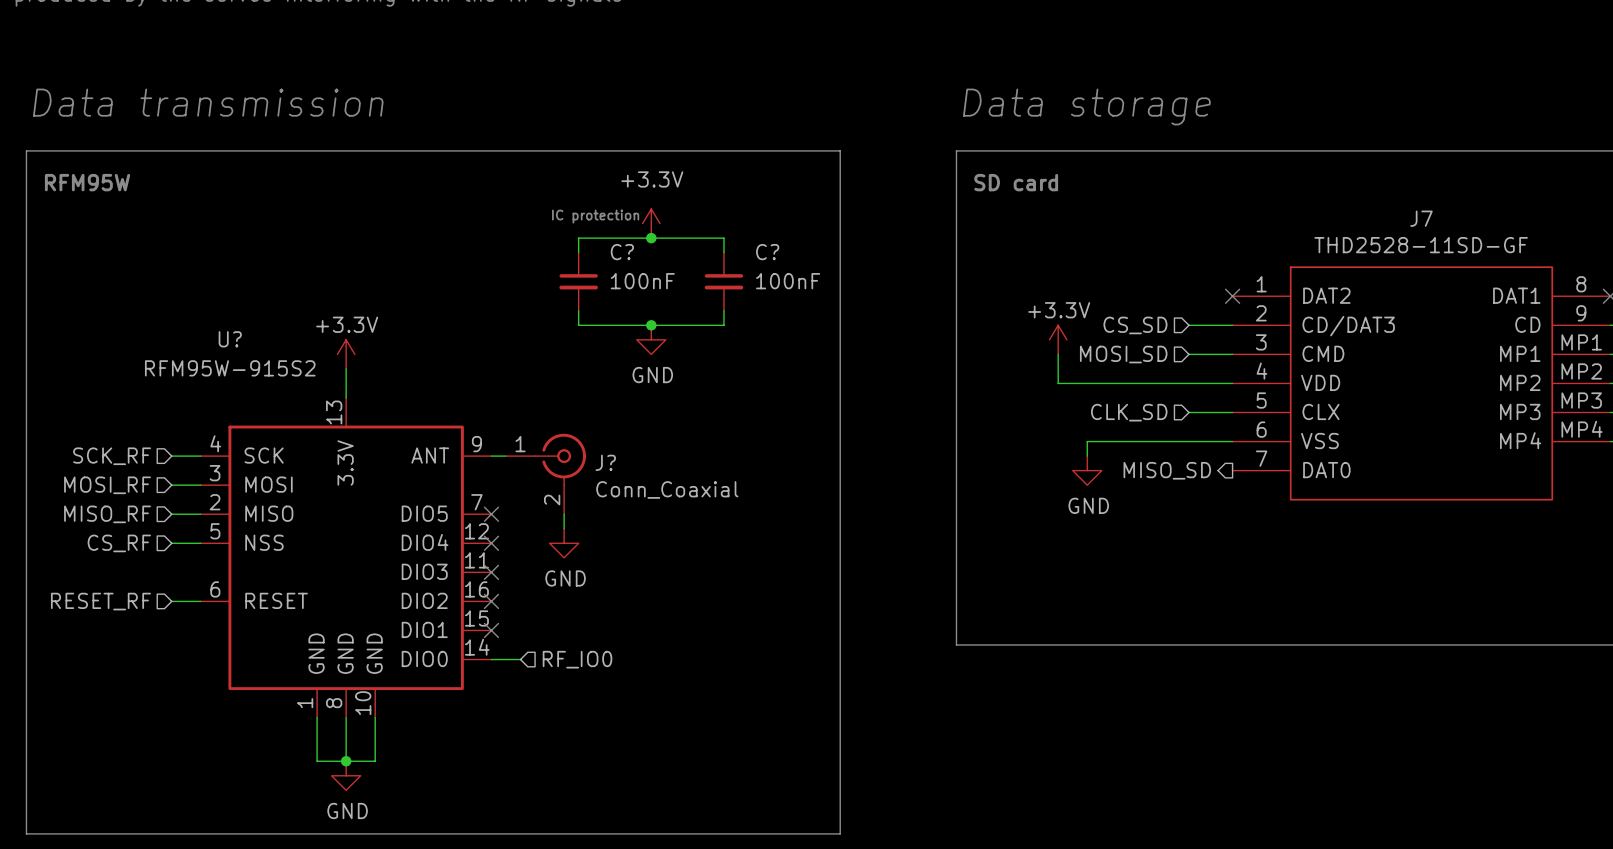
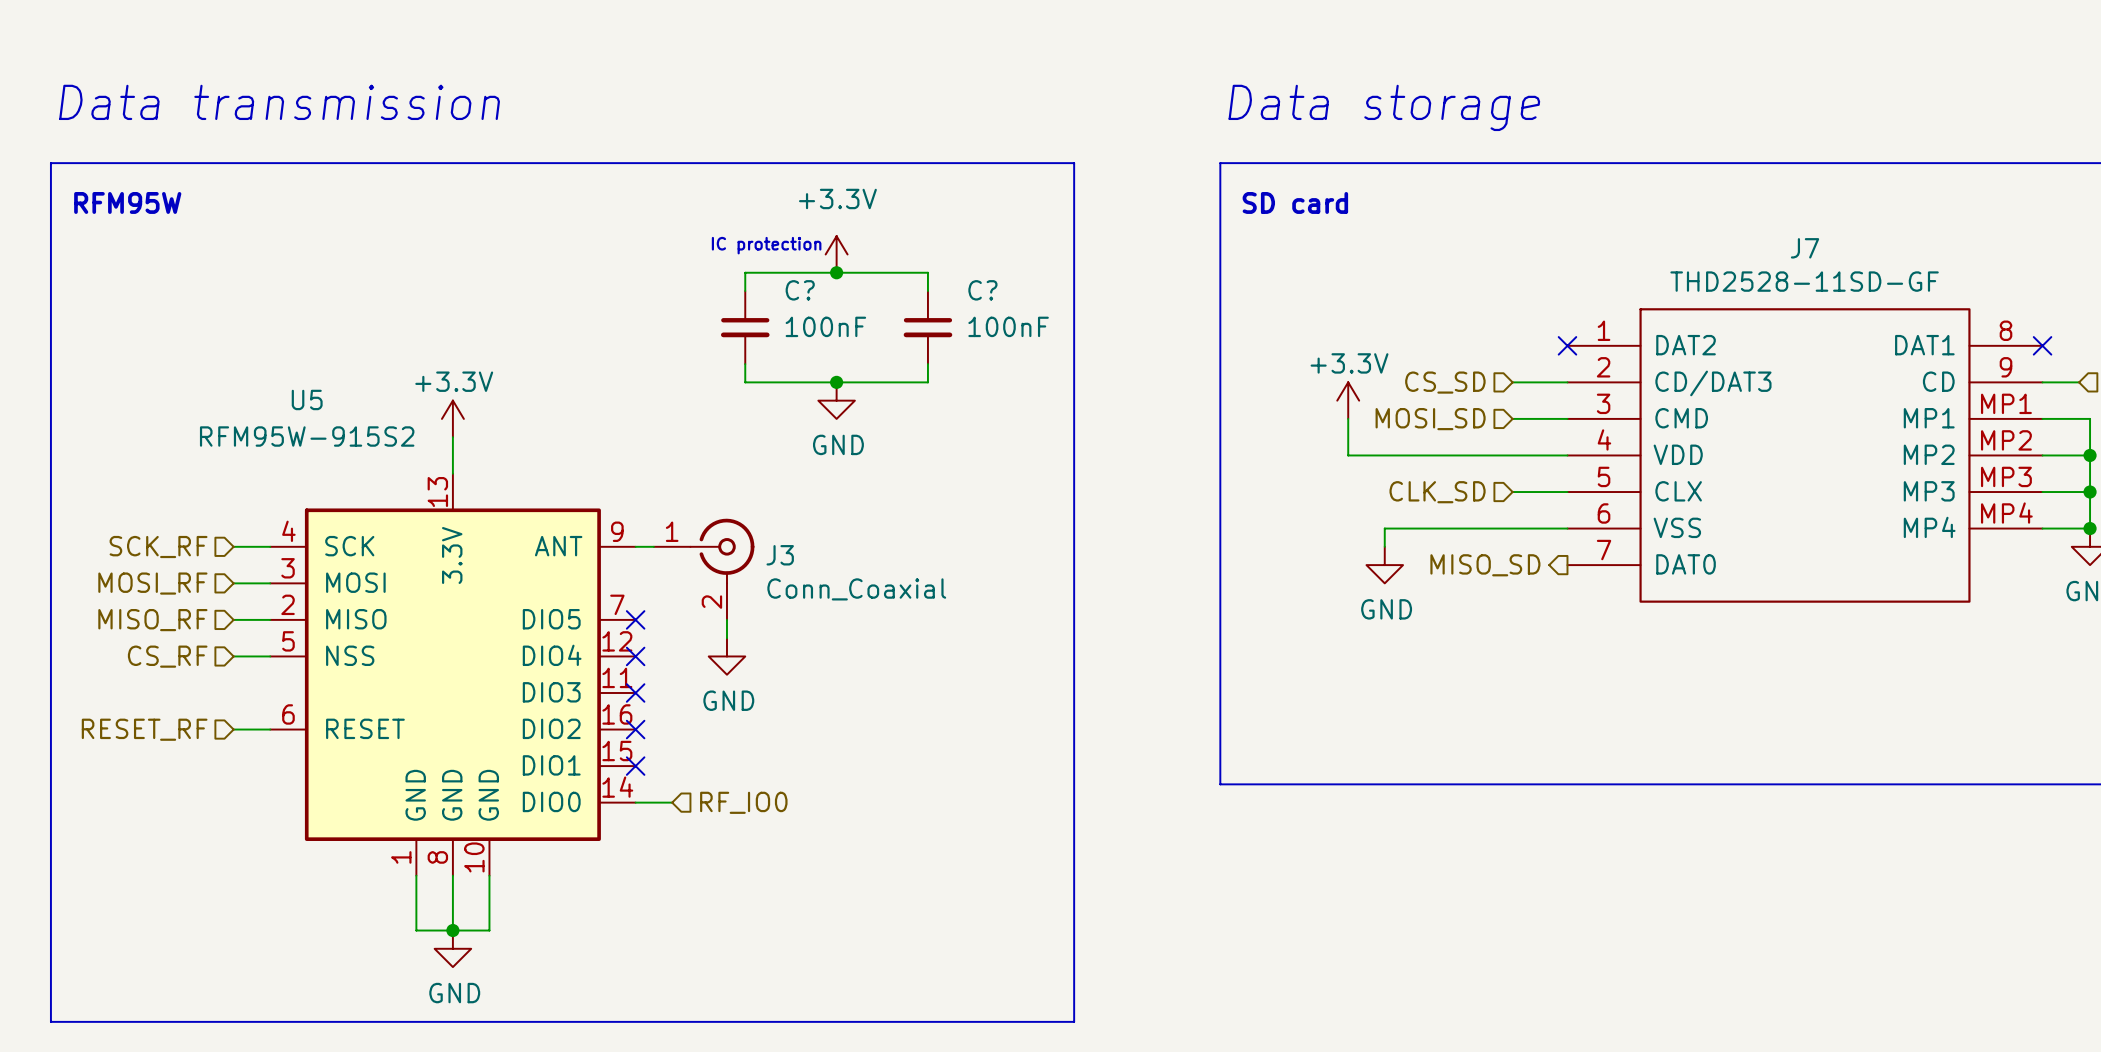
U? name: U? (230, 339) -> U5 (307, 399)
J? name: J? (605, 462) -> J3 (780, 555)

